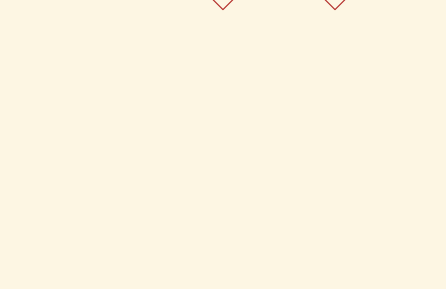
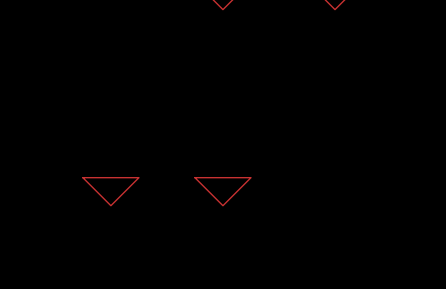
power symbol: none -> (110, 191)
power symbol: none -> (222, 191)

